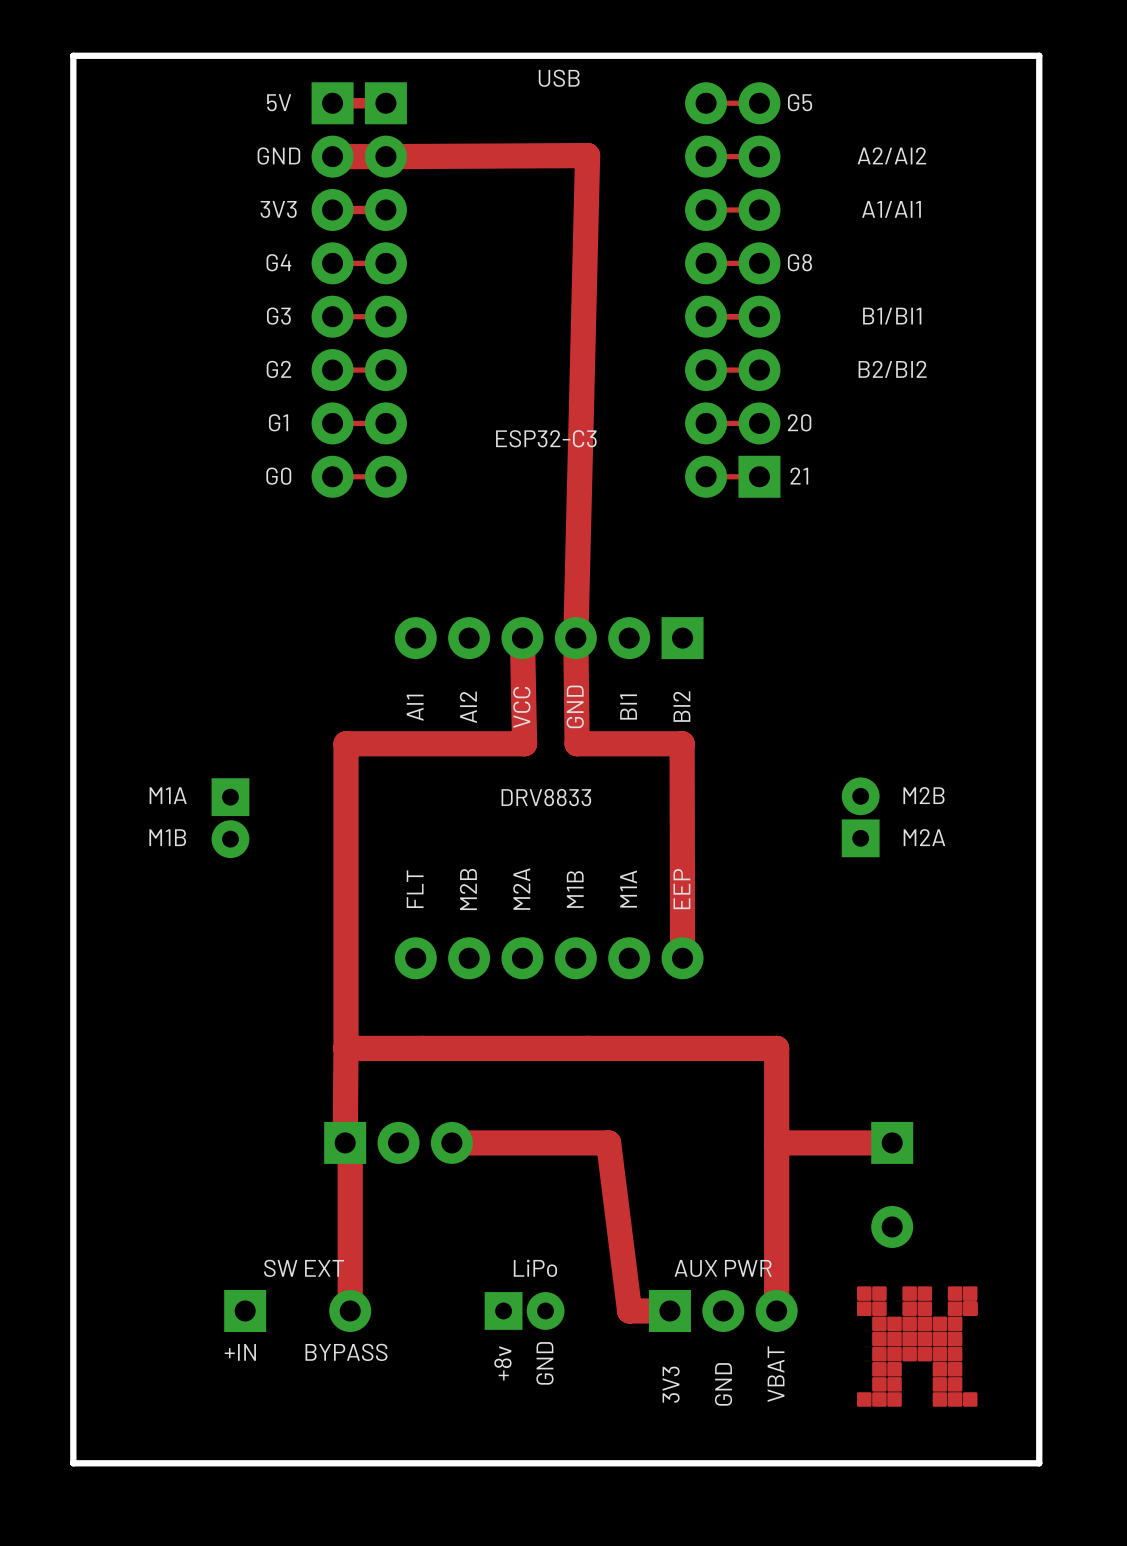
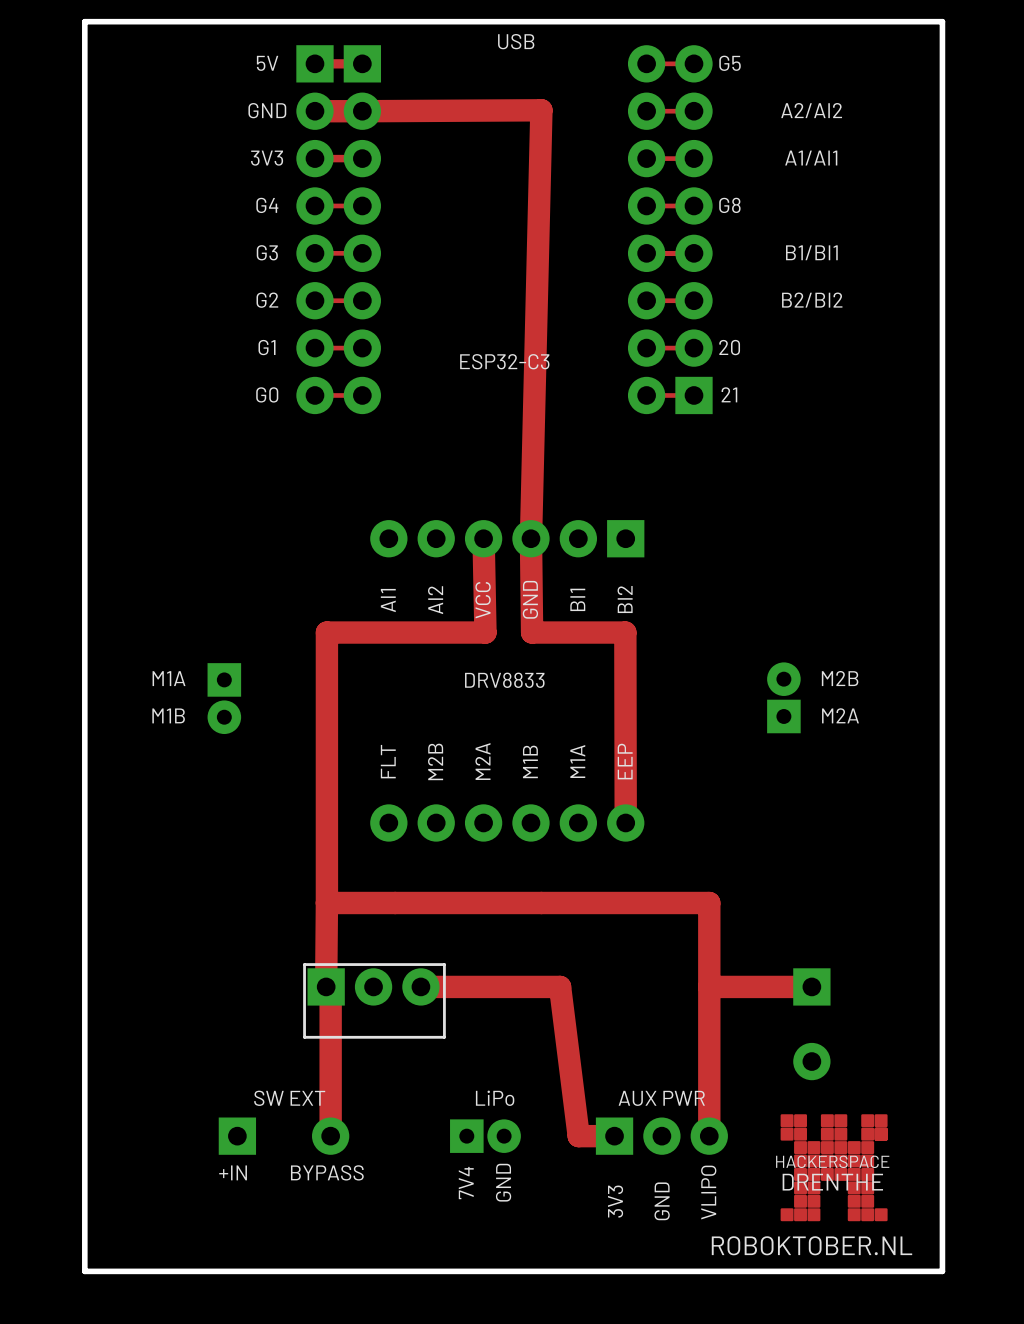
line: none -> (304, 964) (444, 964) (444, 1037) (304, 1037) (304, 964)
text: none -> HACKERSPACE (832, 1161)
text: none -> DRENTHE (832, 1182)
text: +8v (502, 1363) -> 7V4 (466, 1183)
text: VBAT (776, 1374) -> VLIPO (708, 1192)
text: none -> ROBOKTOBER.NL (811, 1245)

